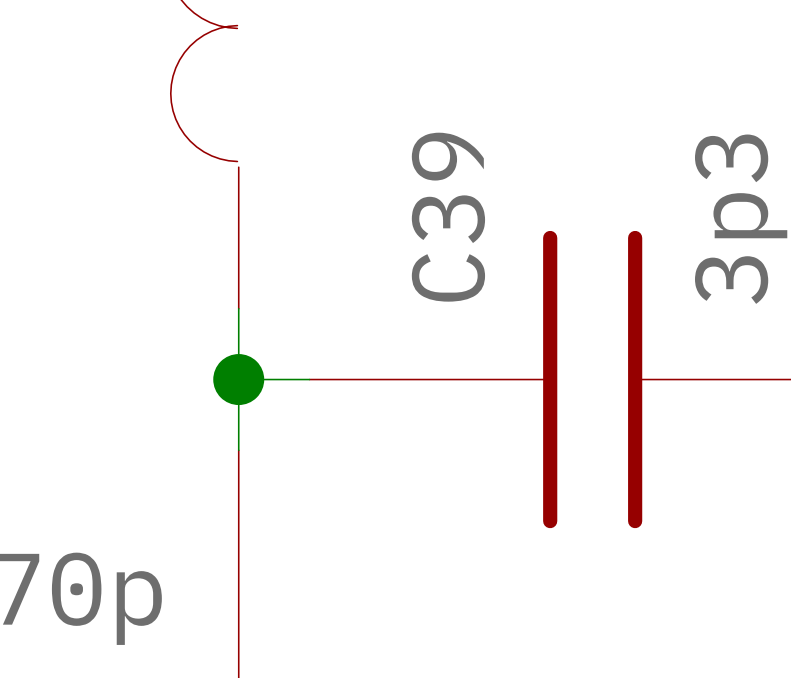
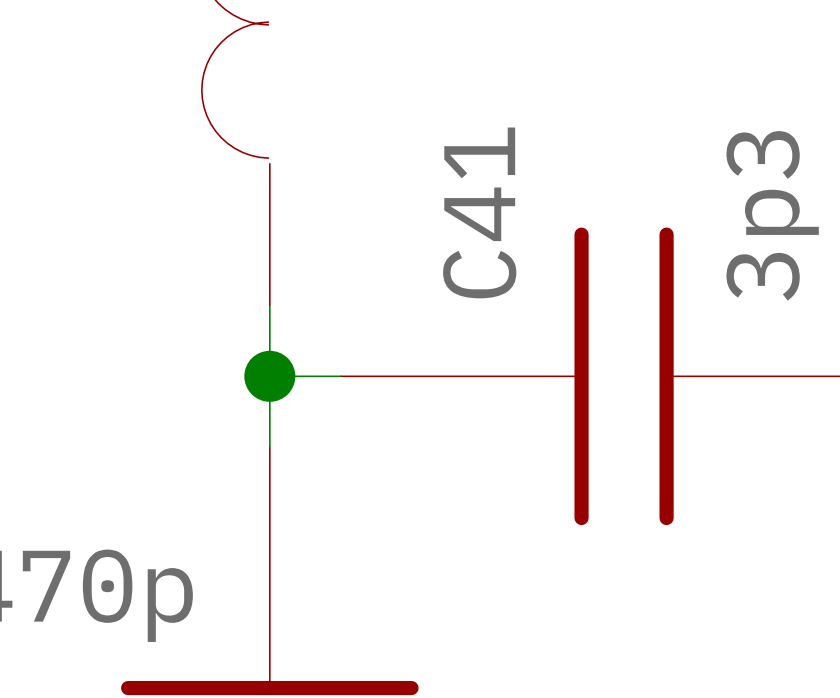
C39 name: C39 (448, 217) -> C41 (479, 212)

